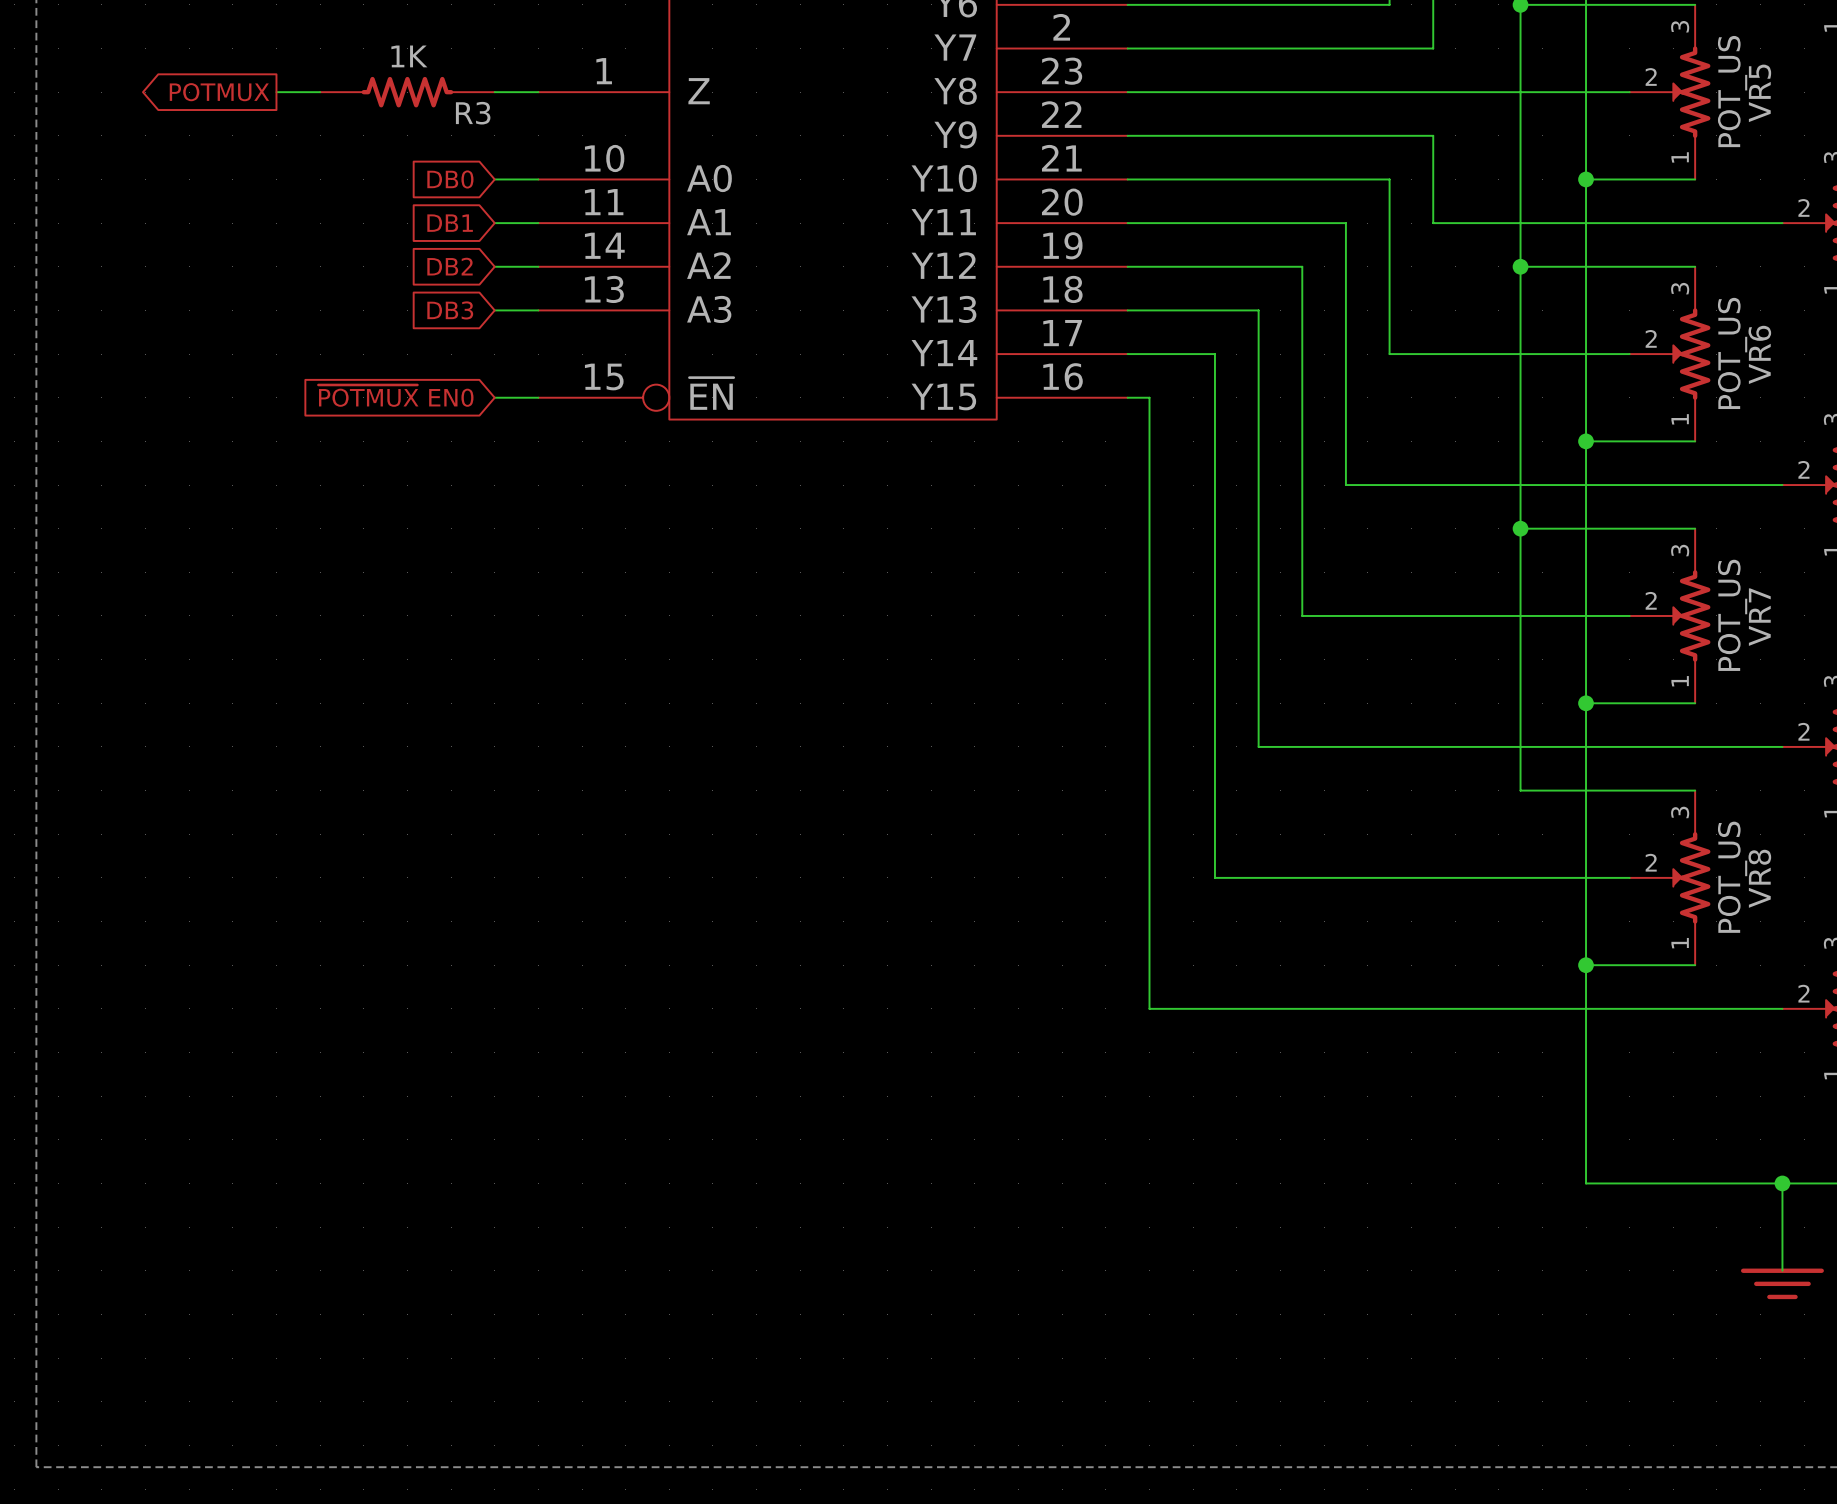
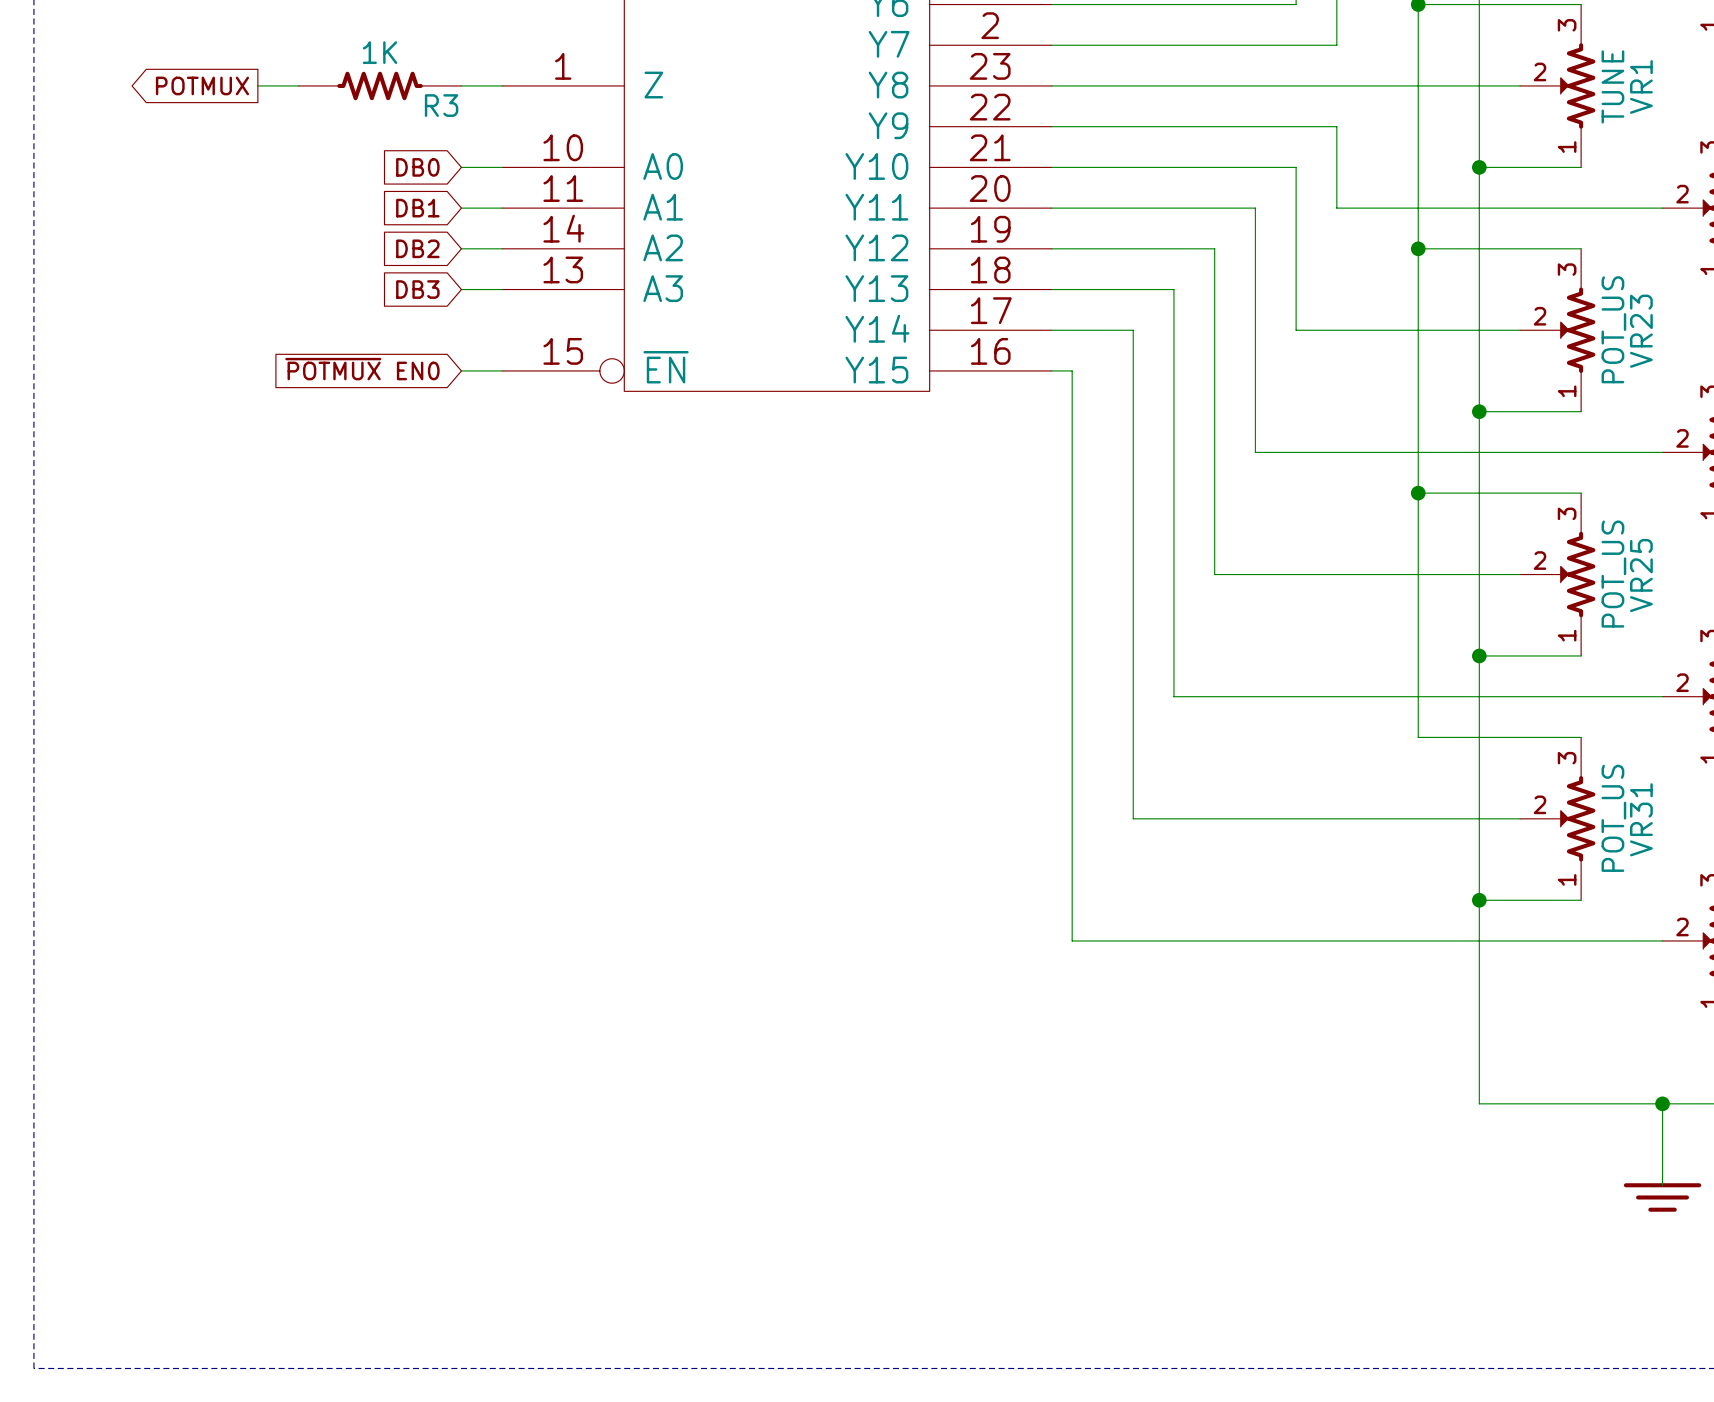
VR5 value: POT_US (1732, 91) -> TUNE (1612, 86)
VR5 name: VR5 (1760, 93) -> VR1 (1641, 86)
VR6 name: VR6 (1759, 354) -> VR23 (1641, 331)
VR7 name: VR7 (1759, 617) -> VR25 (1641, 575)
VR8 name: VR8 (1759, 878) -> VR31 (1641, 819)

